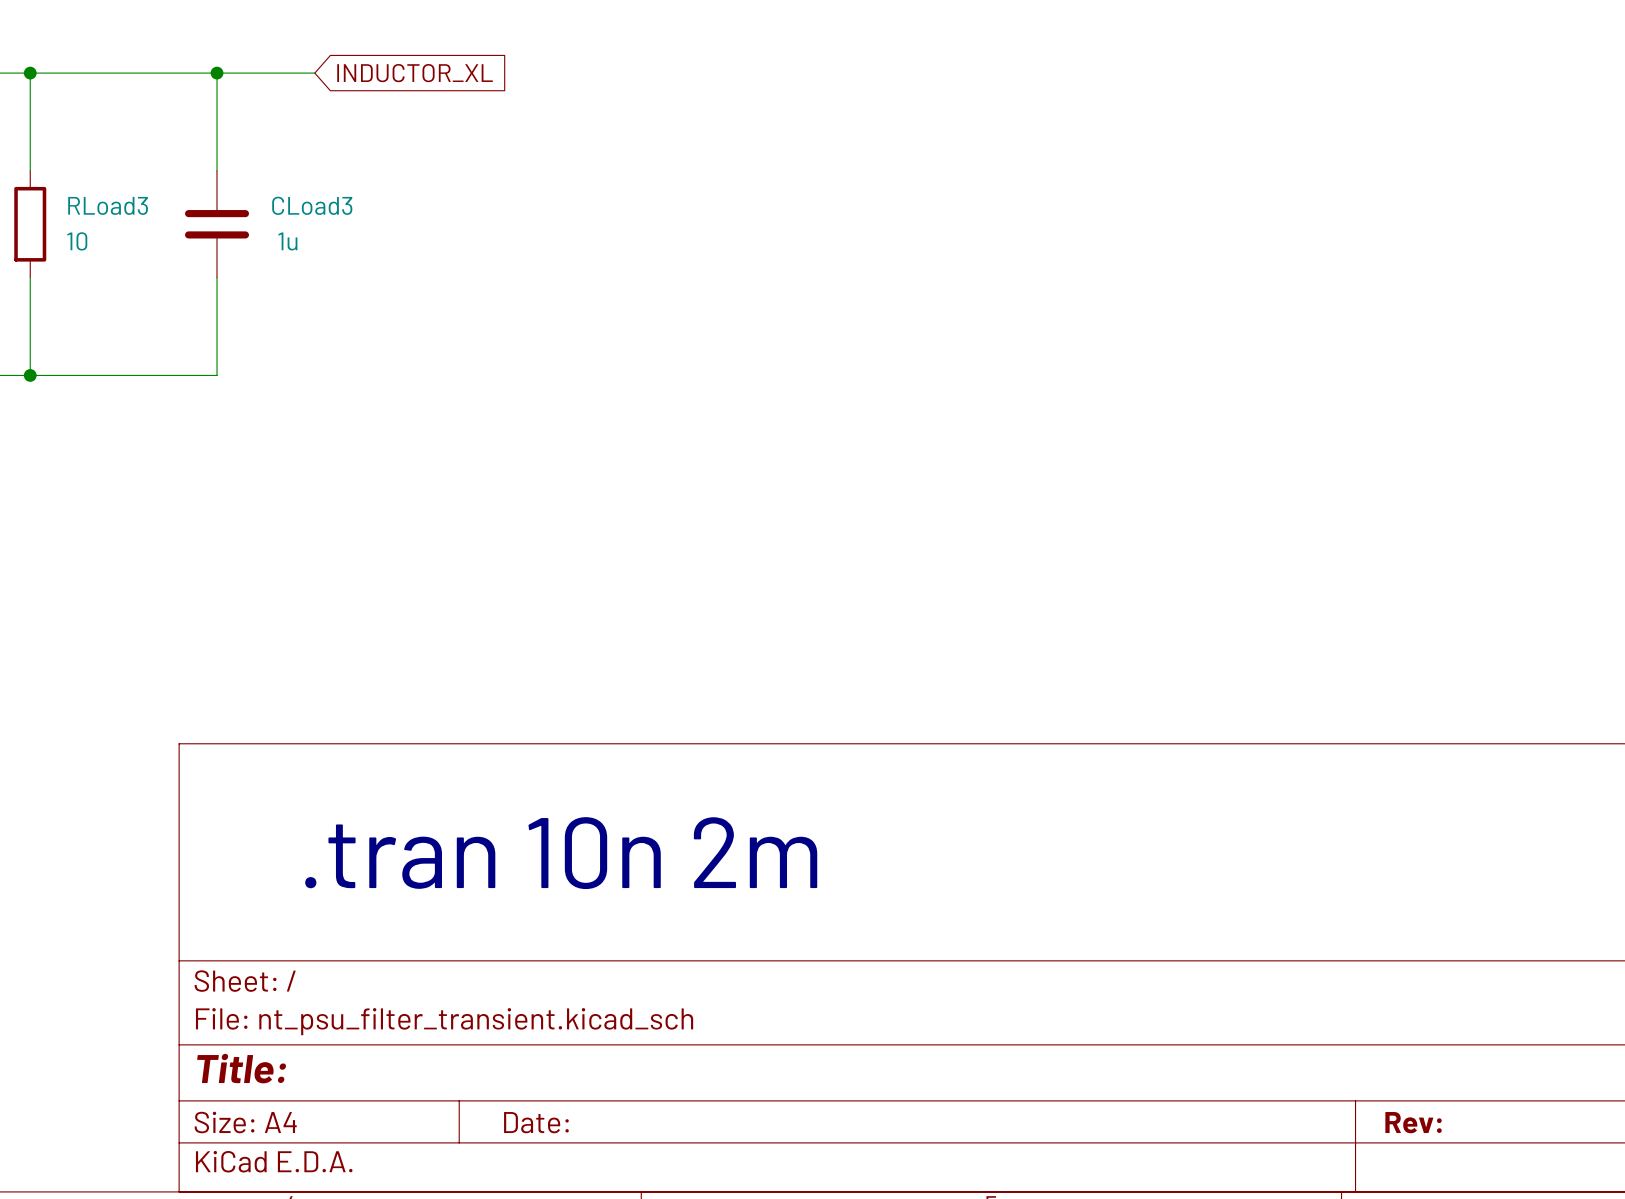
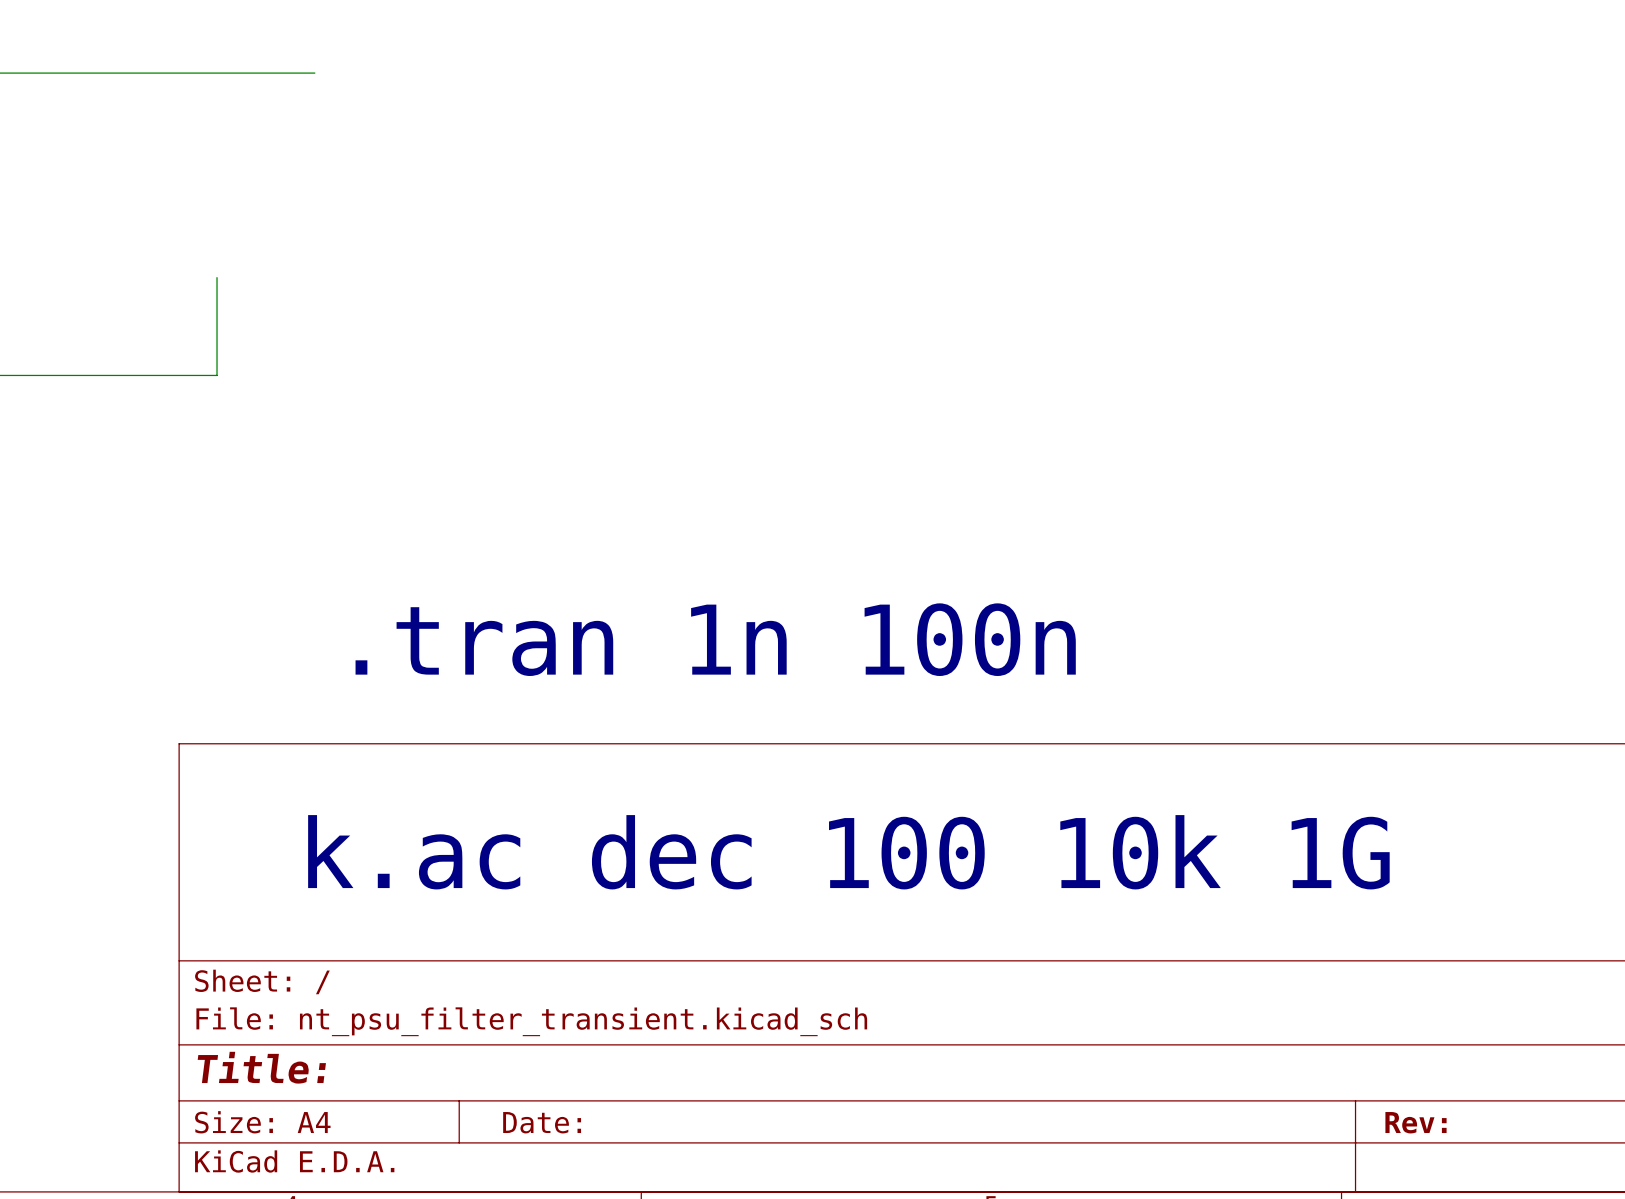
wire: (30, 73) (30, 170) -> none
junction: (30, 73) -> none
wire: (217, 73) (217, 170) -> none
junction: (217, 73) -> none
global label: INDUCTOR_XL (415, 73) -> none
RLoad3: 10 (30, 224) -> none
CLoad3: (217, 224) -> none
wire: (30, 277) (30, 375) -> none
junction: (30, 375) -> none
text: none -> .tran 1n 100n (715, 639)
text: .tran 10n 2m (561, 853) -> k.ac dec 100 10k 1G (848, 852)

